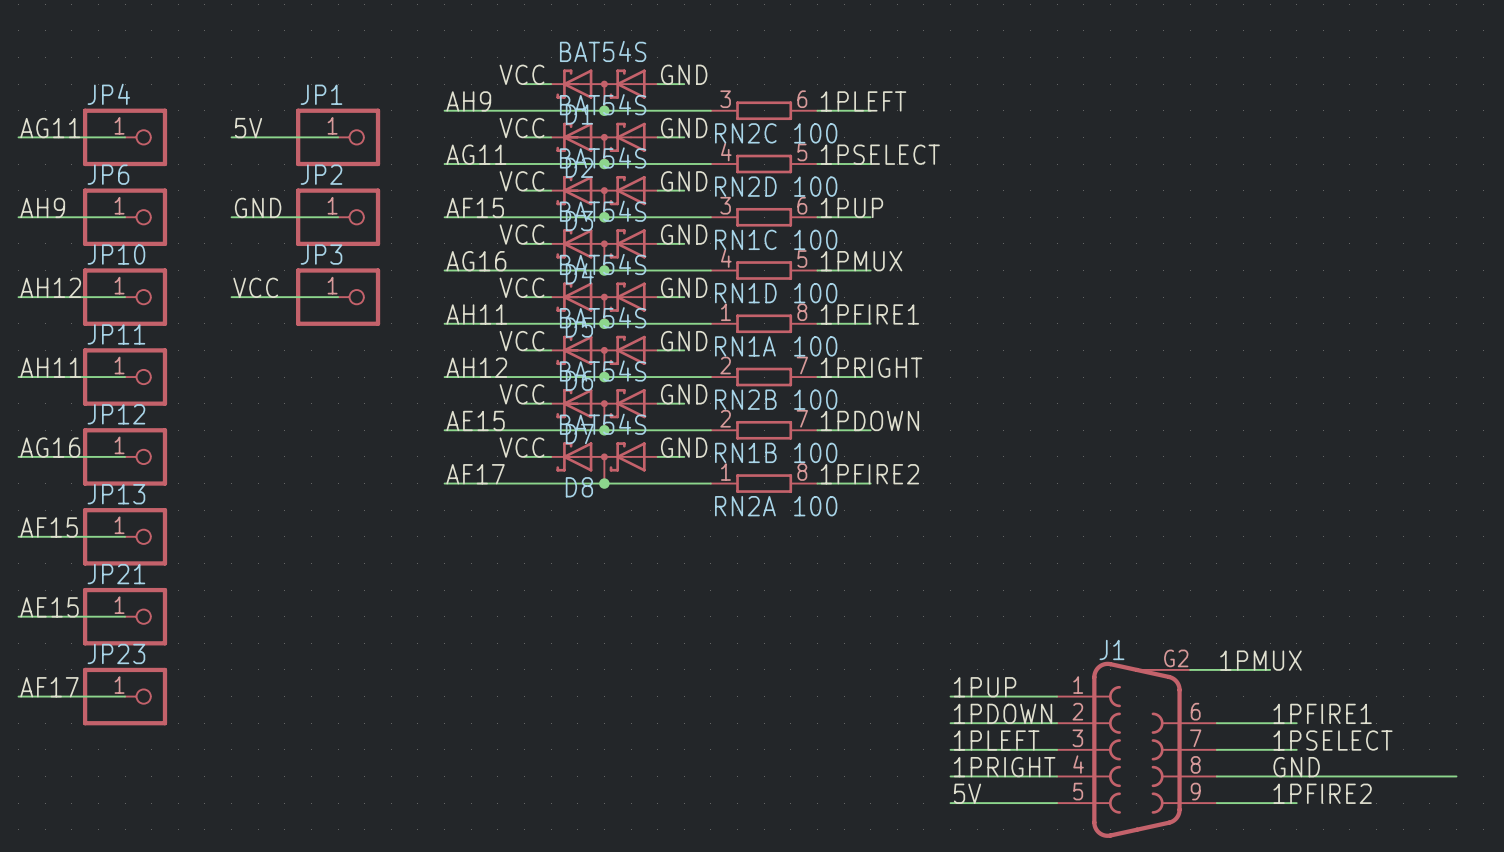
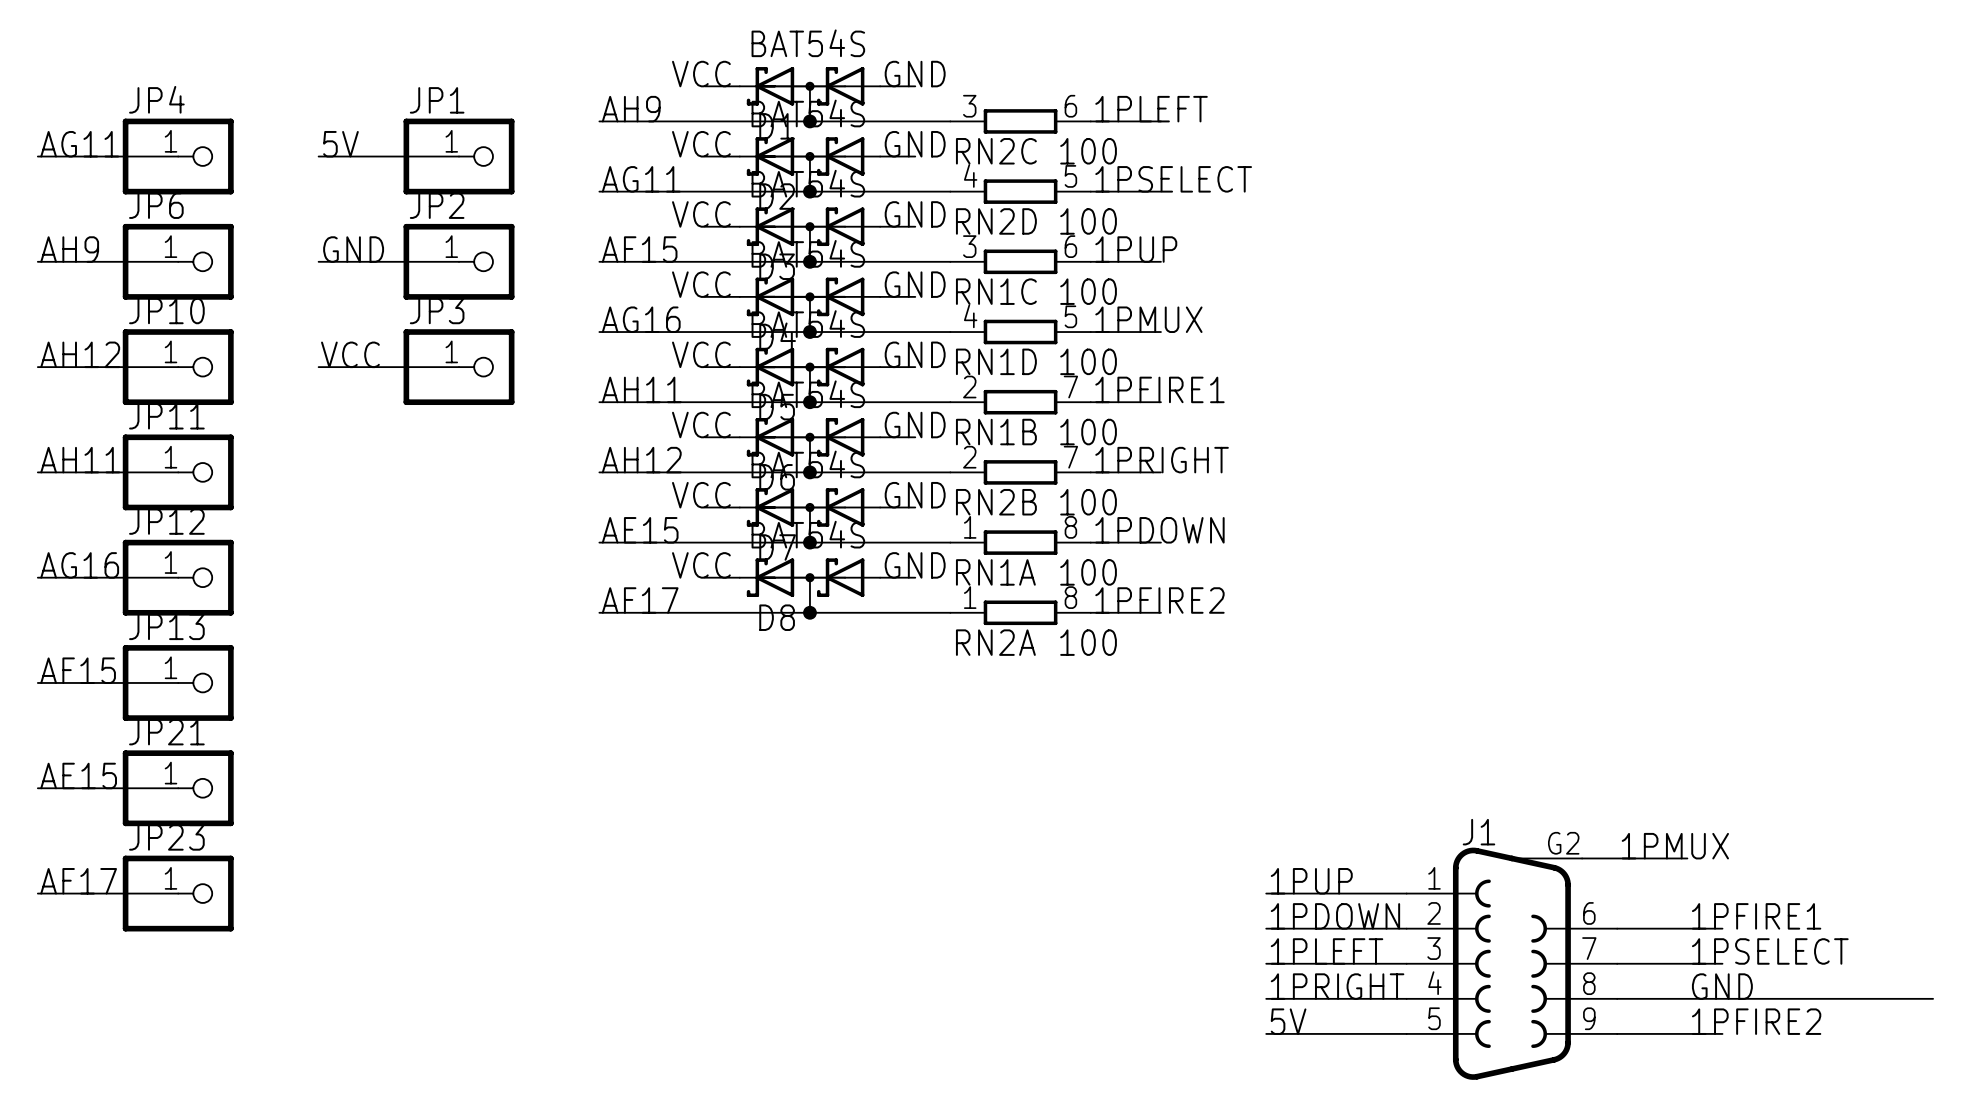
RN1A position: (764, 323) -> (1020, 542)
RN1B position: (764, 430) -> (1020, 402)

